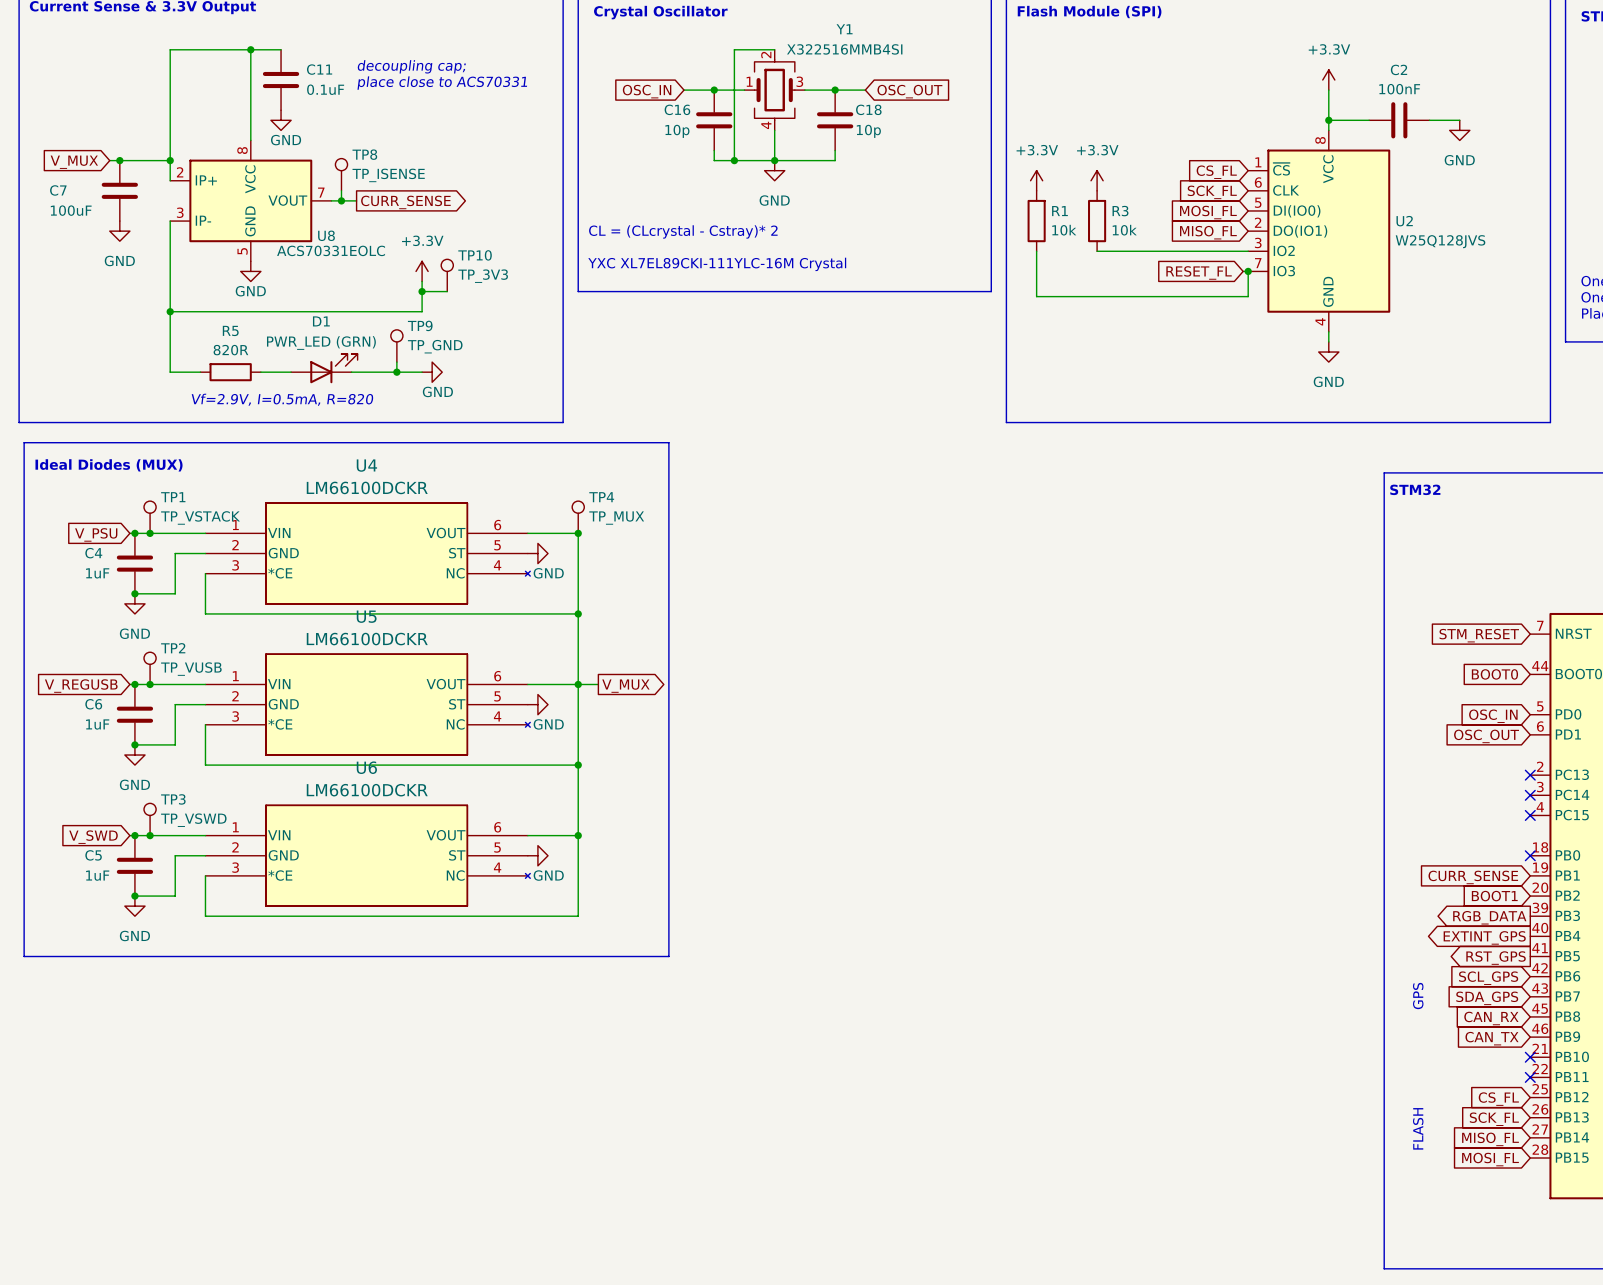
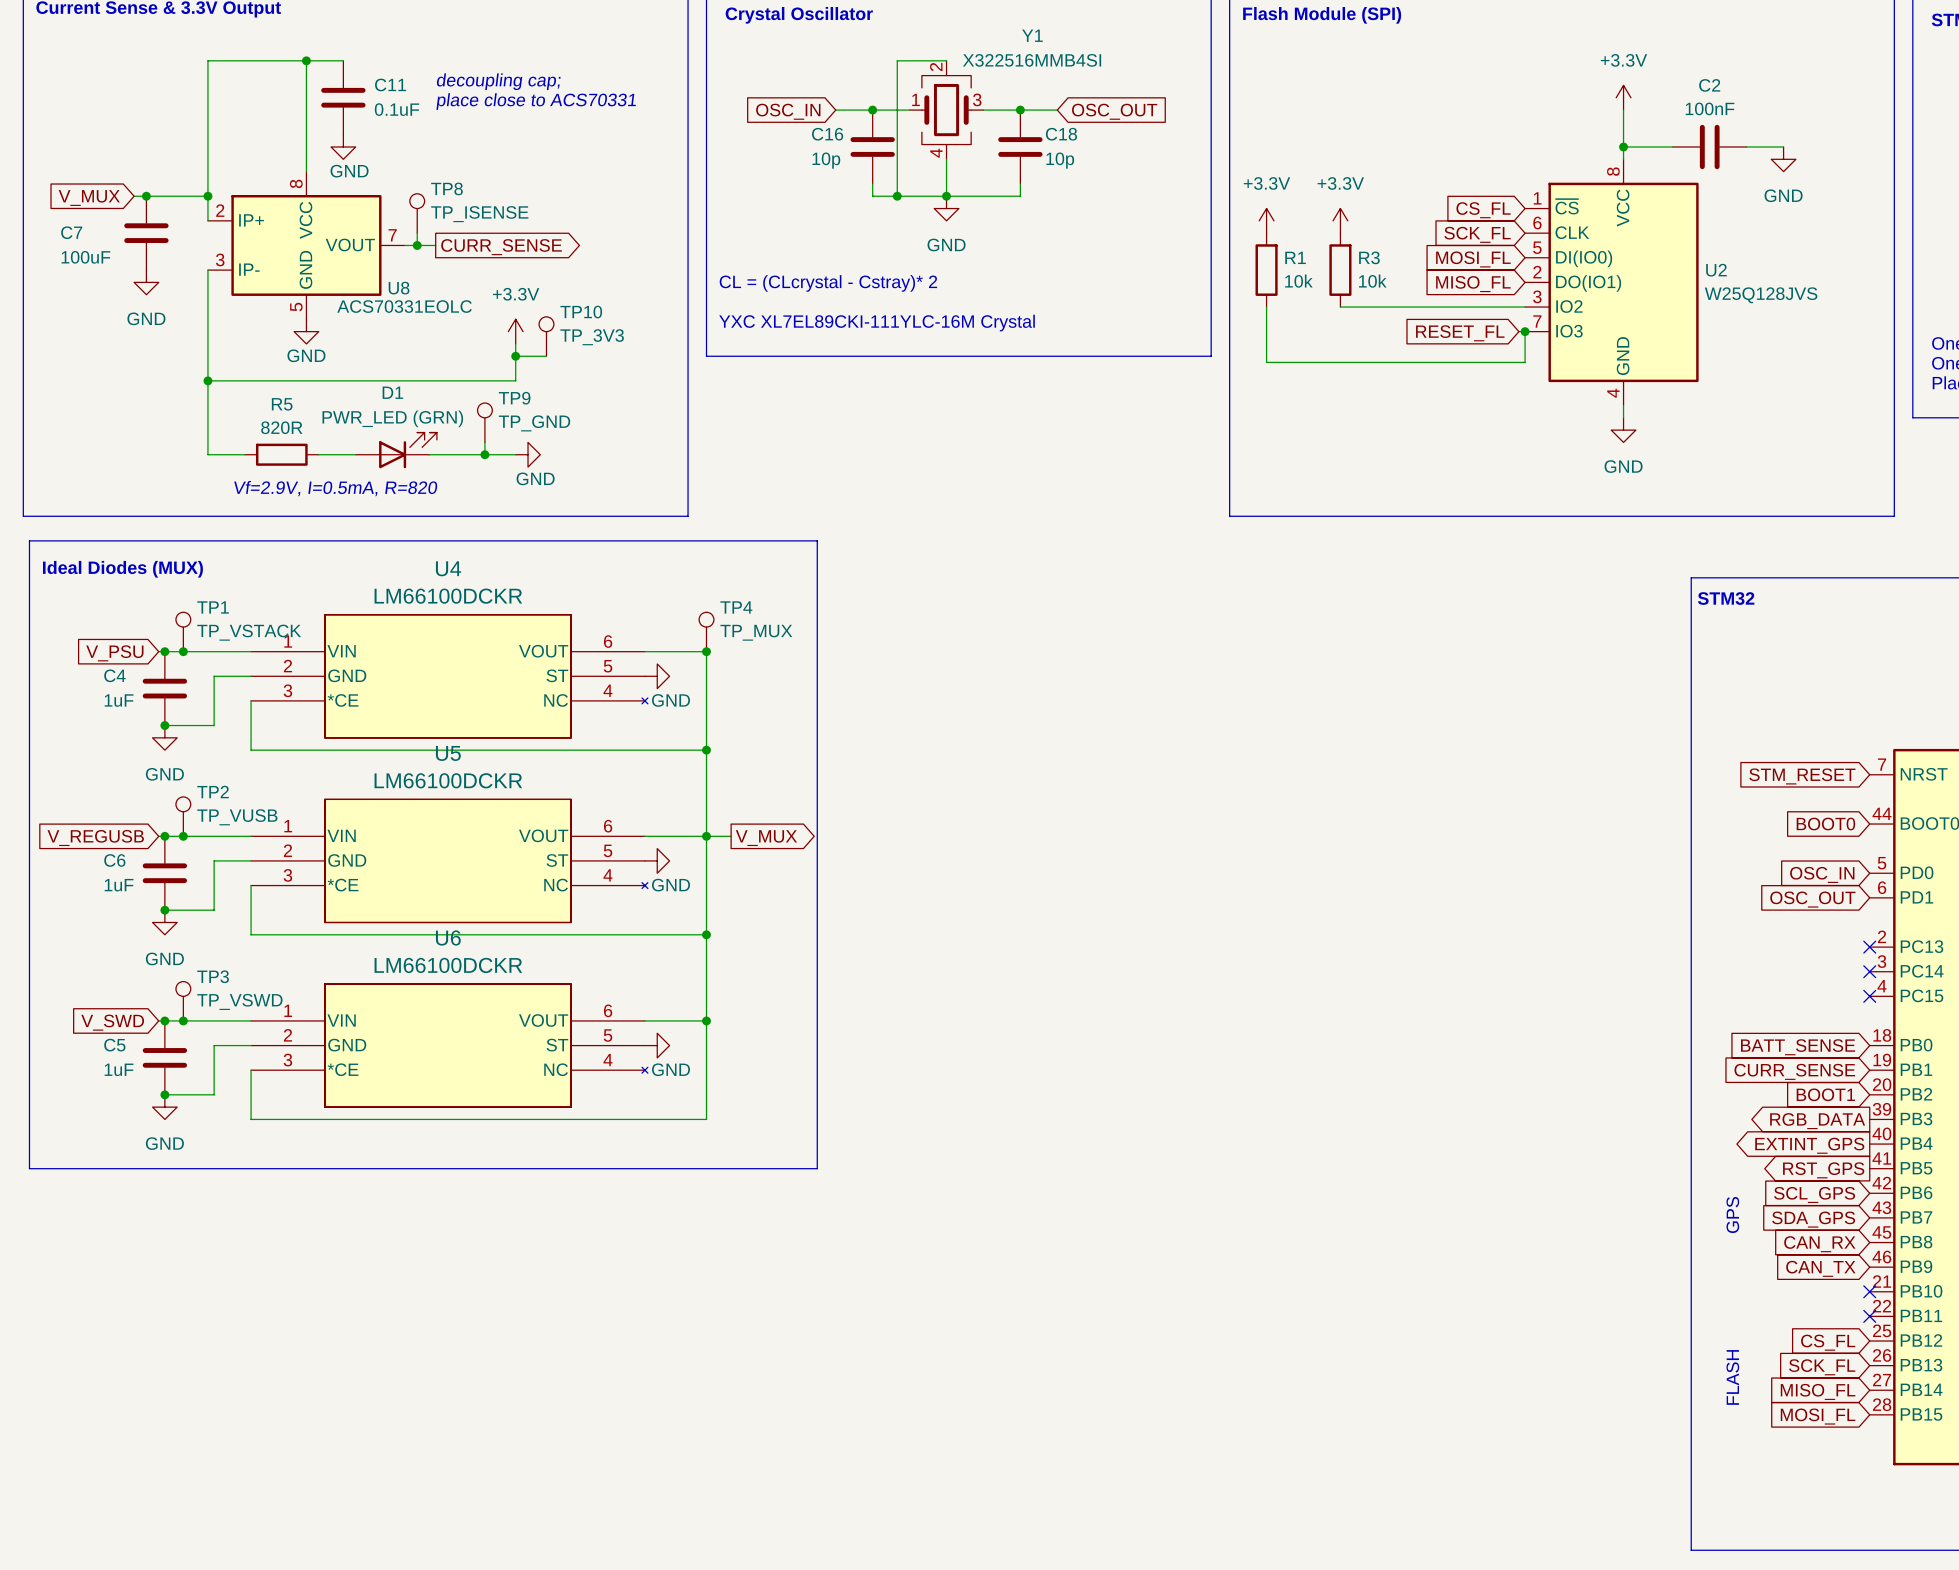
no-connect mark: (1530, 855) -> none
global label: none -> BATT_SENSE (1798, 1047)

